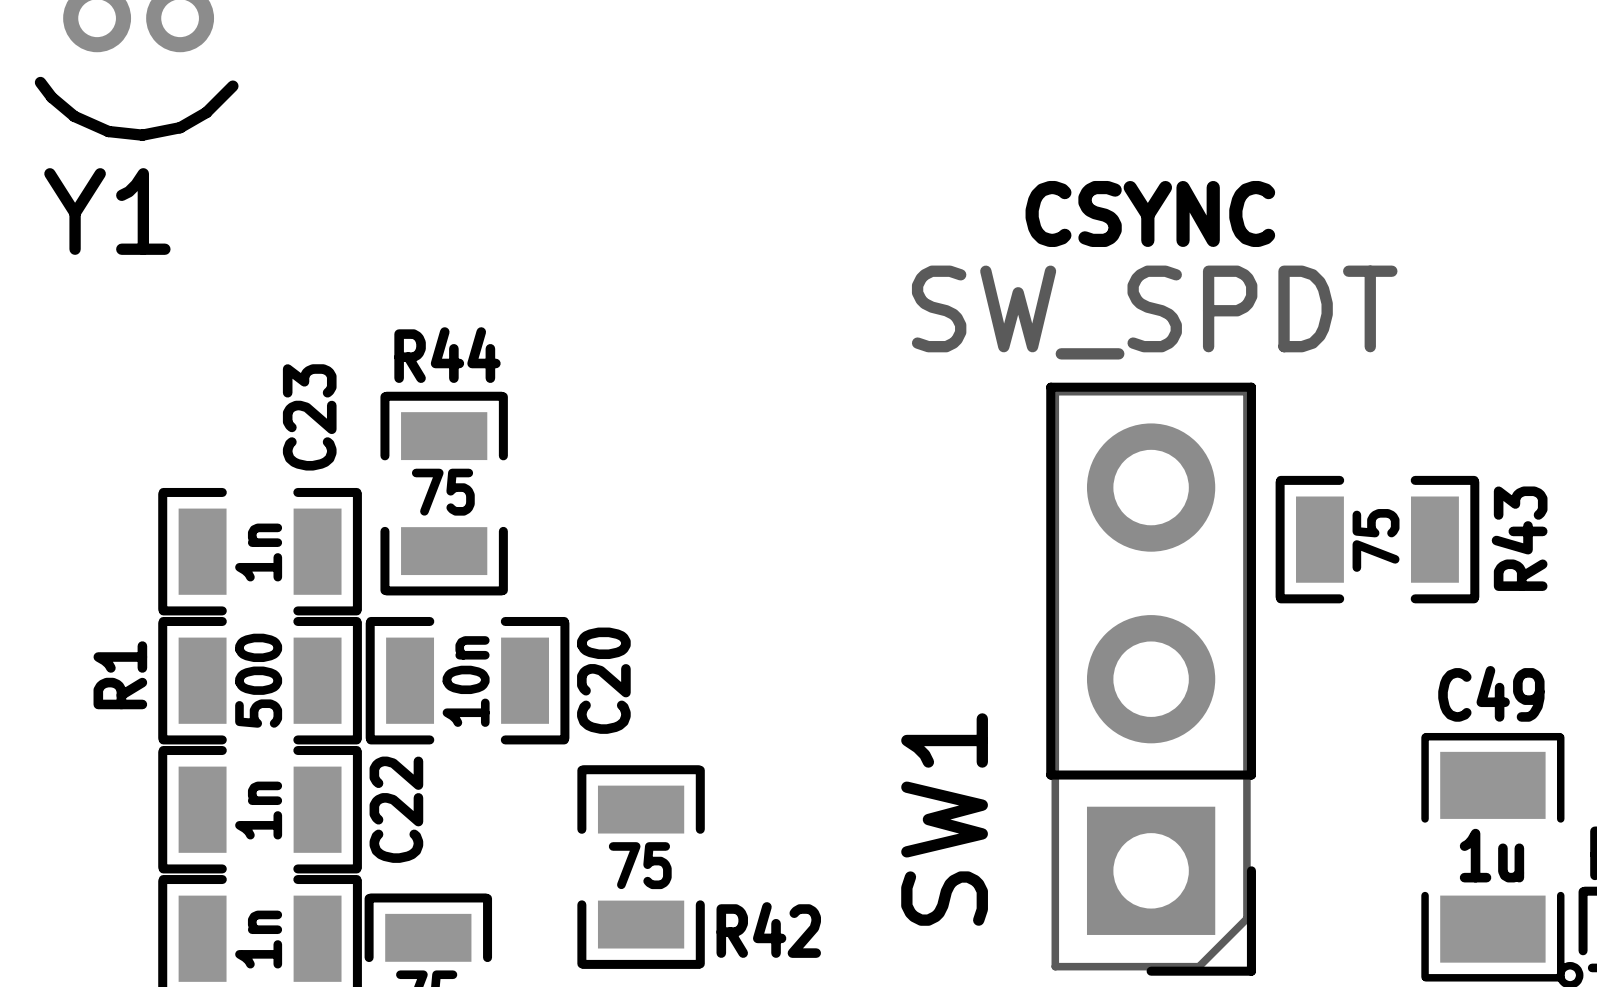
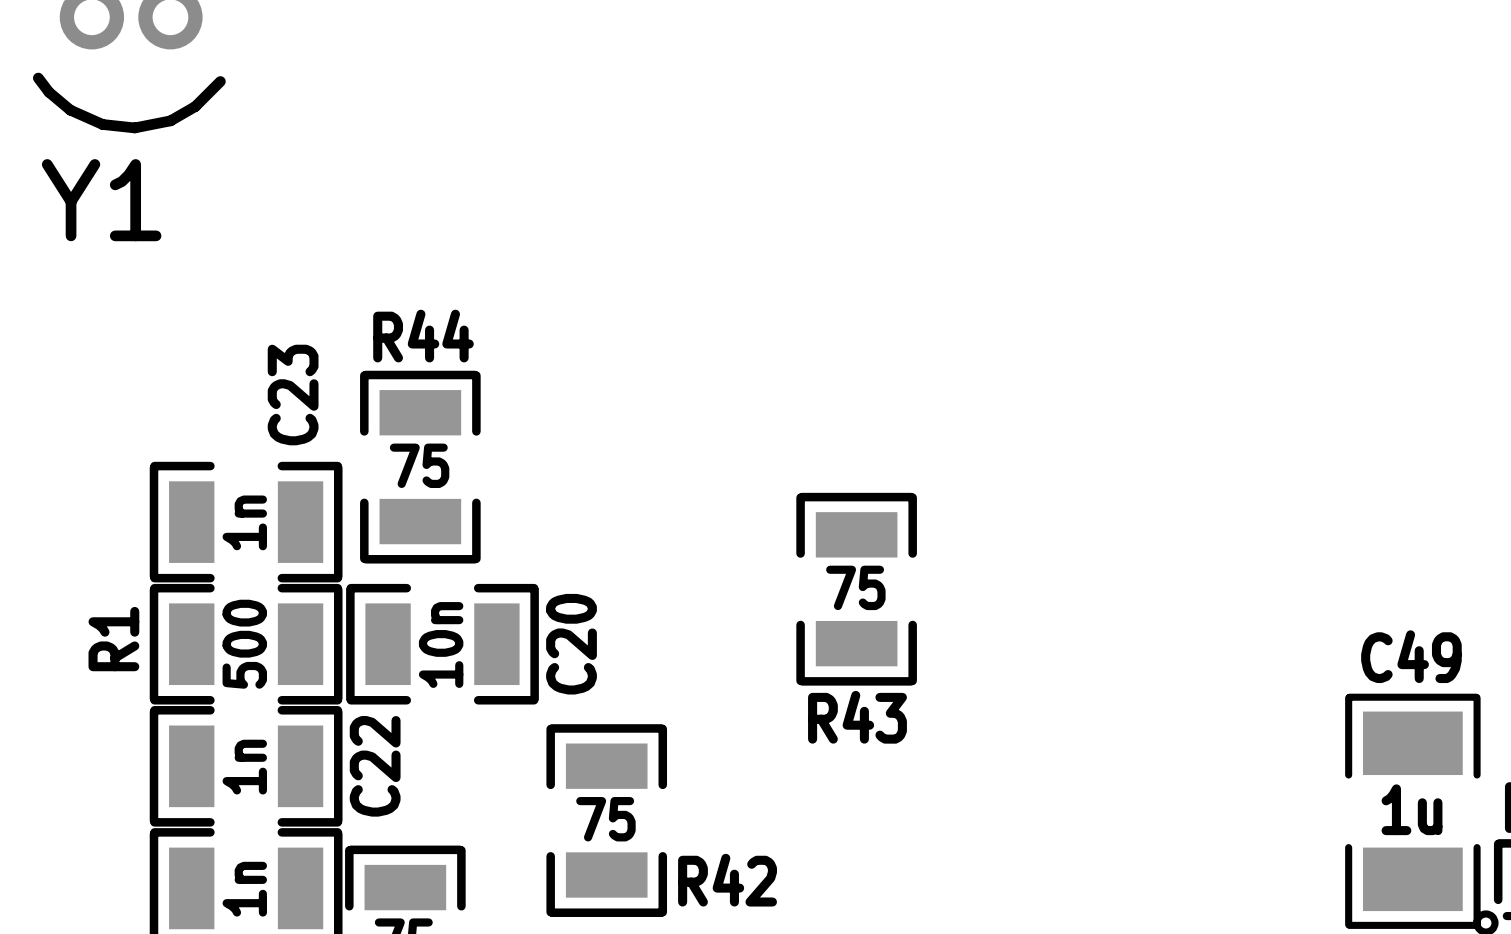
text: CSYNC (1150, 213) -> none
R43 rotation: 0° (1377, 539) -> 90° clockwise (856, 589)
R43 position: (1377, 539) -> (856, 589)
SW1: SW_SPDT (1151, 679) -> none

